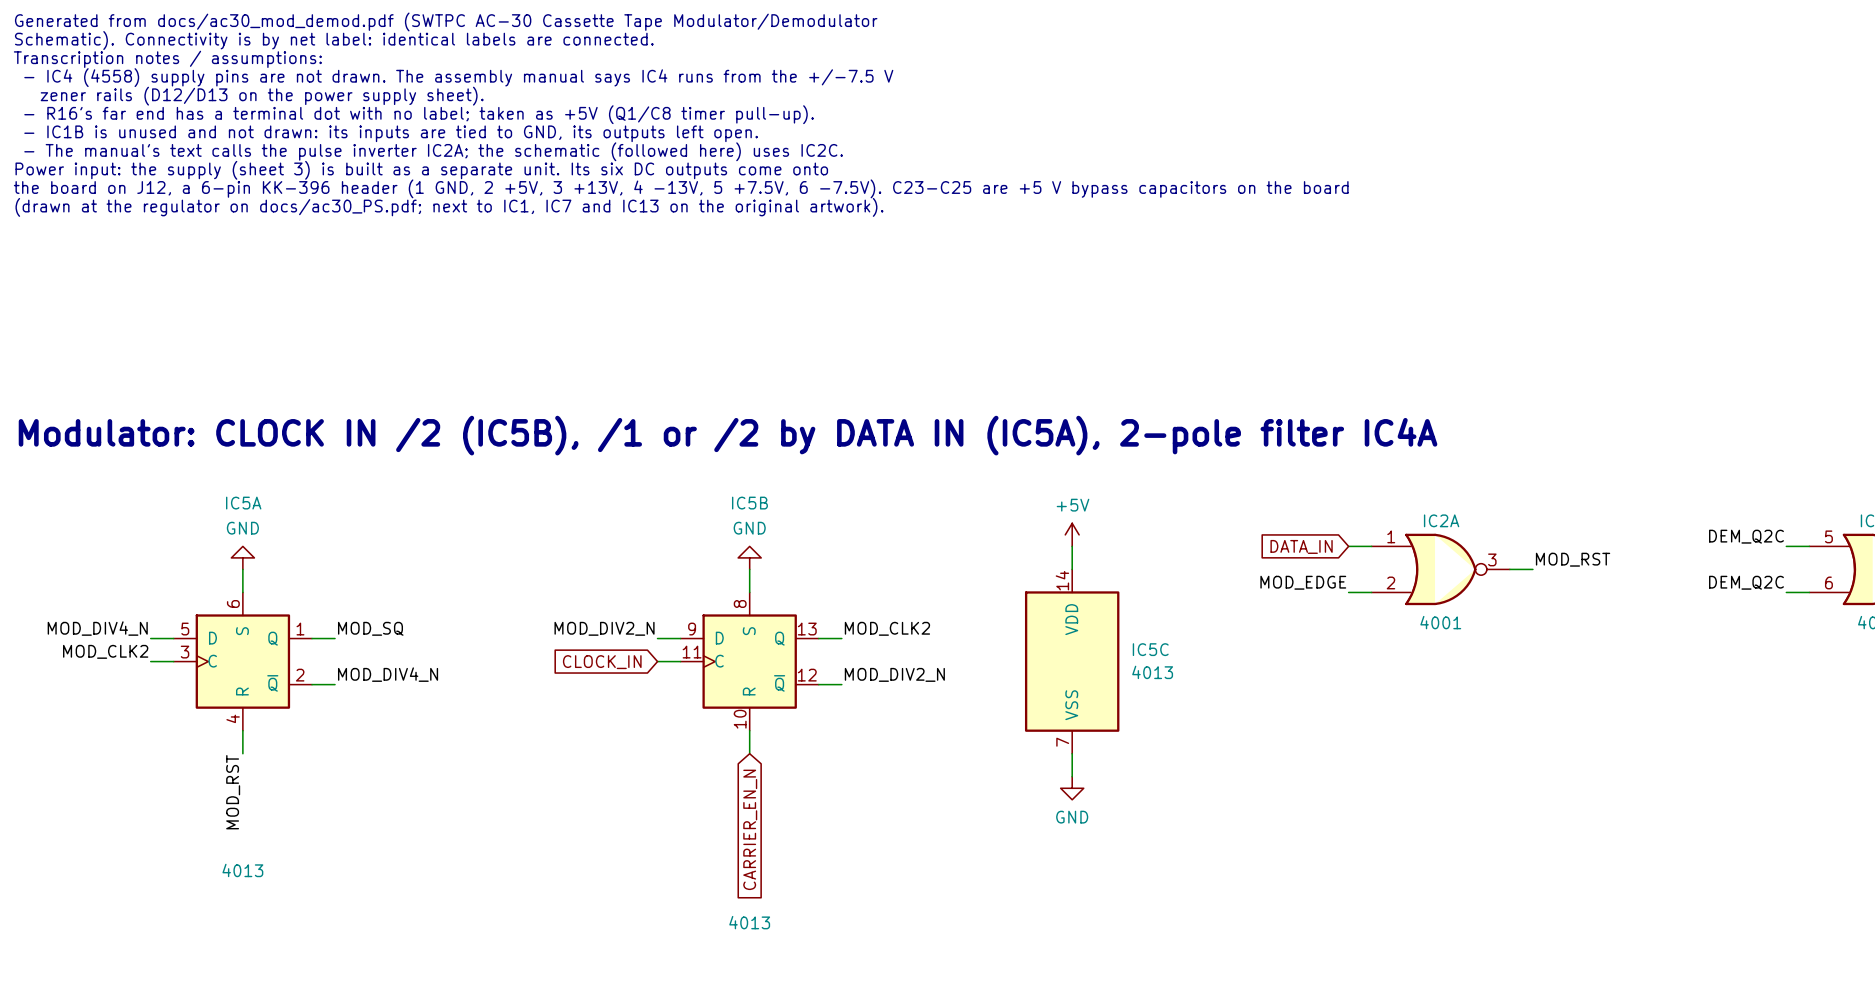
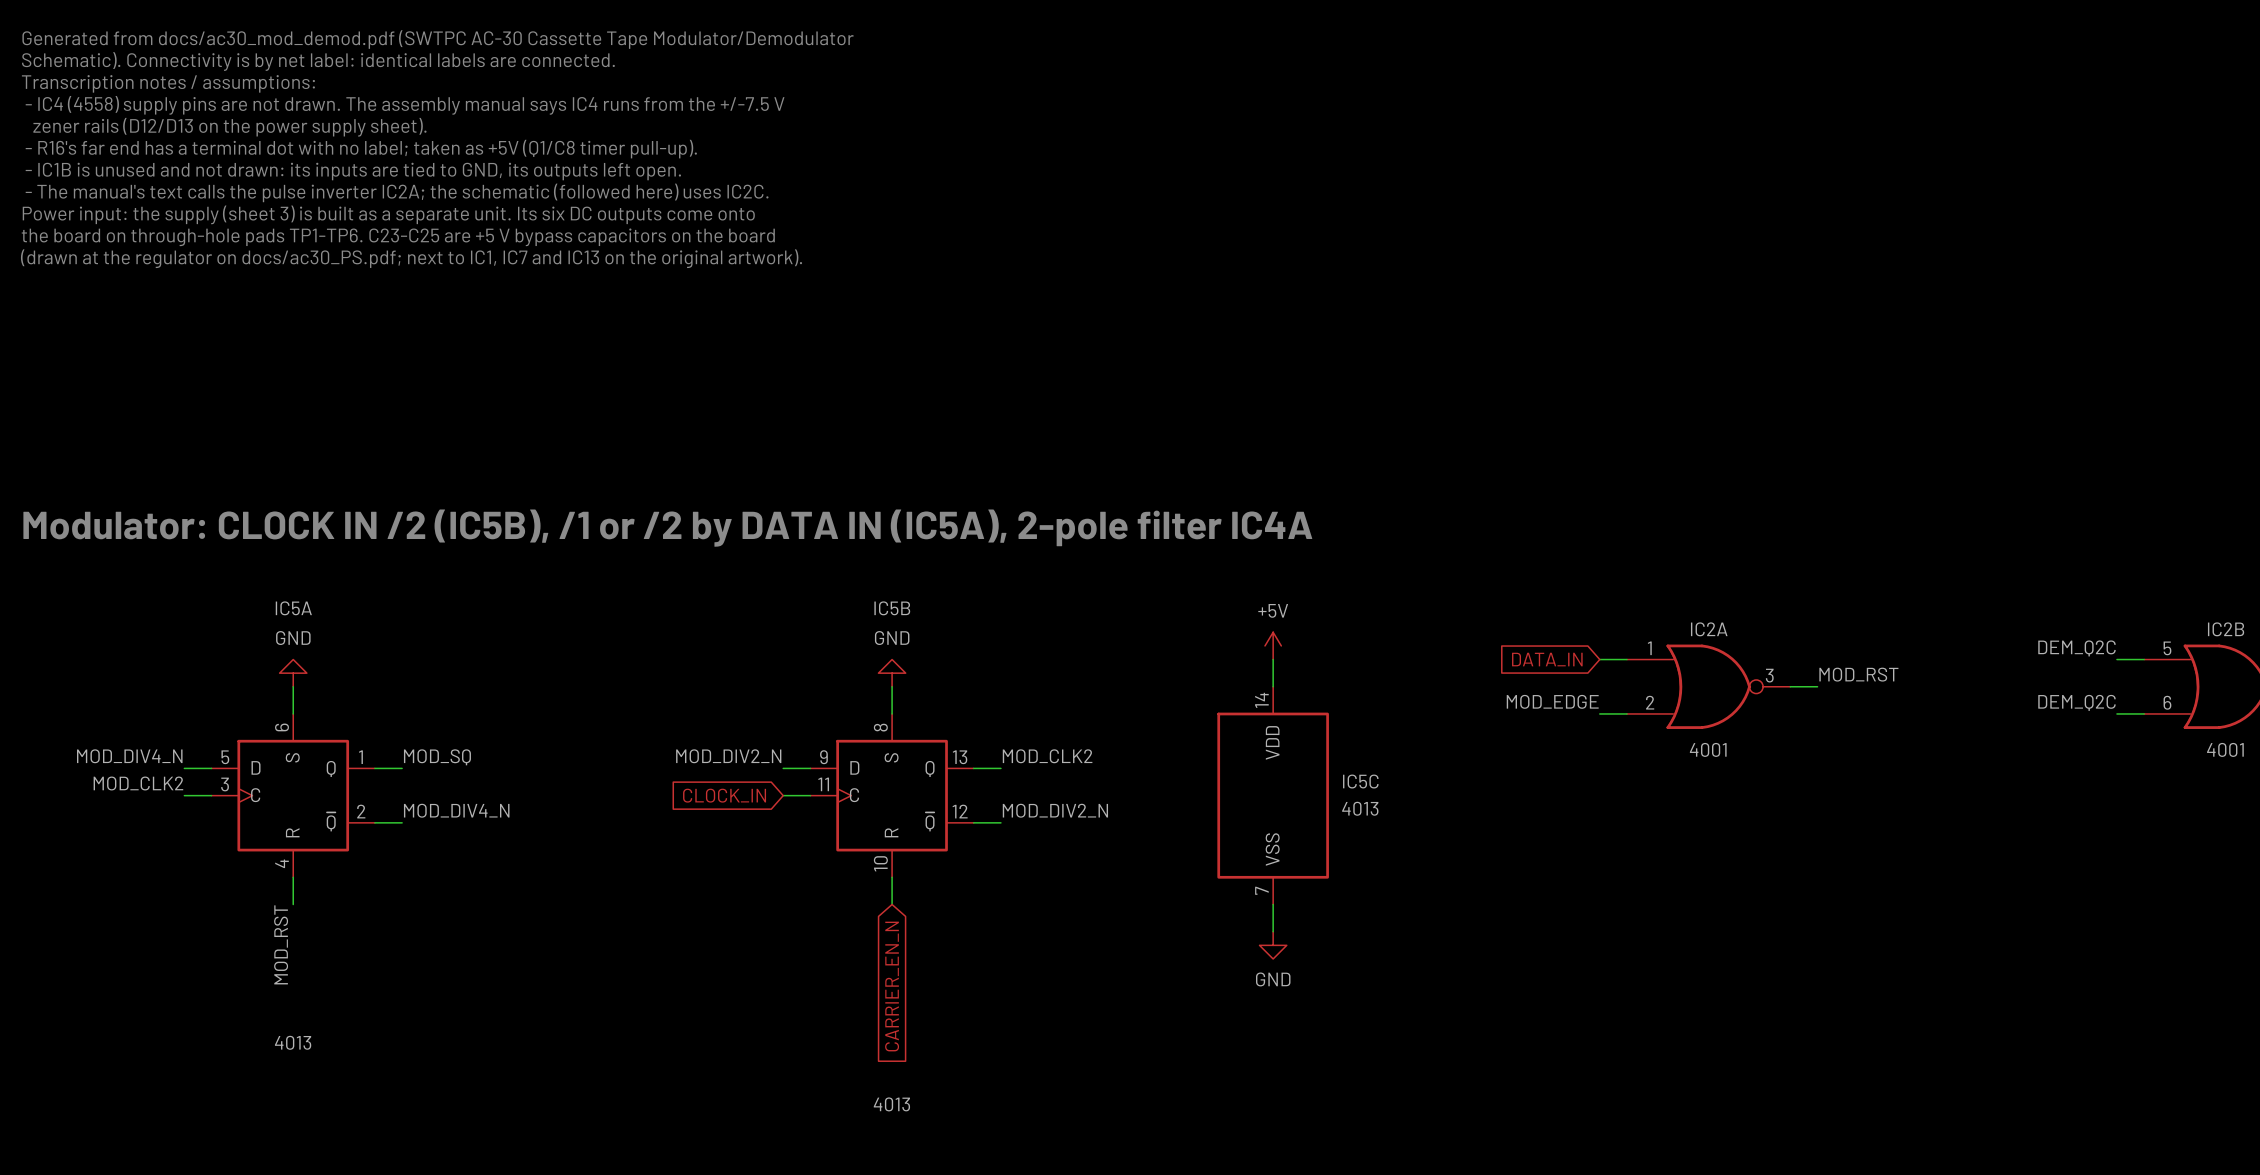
text: the board on J12, a 6-pin KK-396 header (1 GND, 2 +5V, 3 +13V, 4 -13V, 5 +7.5V, 6 -7.5V). C23-C25 are +5 V bypass capacitors on the board (681, 188) -> the board on through-hole pads TP1-TP6. C23-C25 are +5 V bypass capacitors on the board (398, 237)

